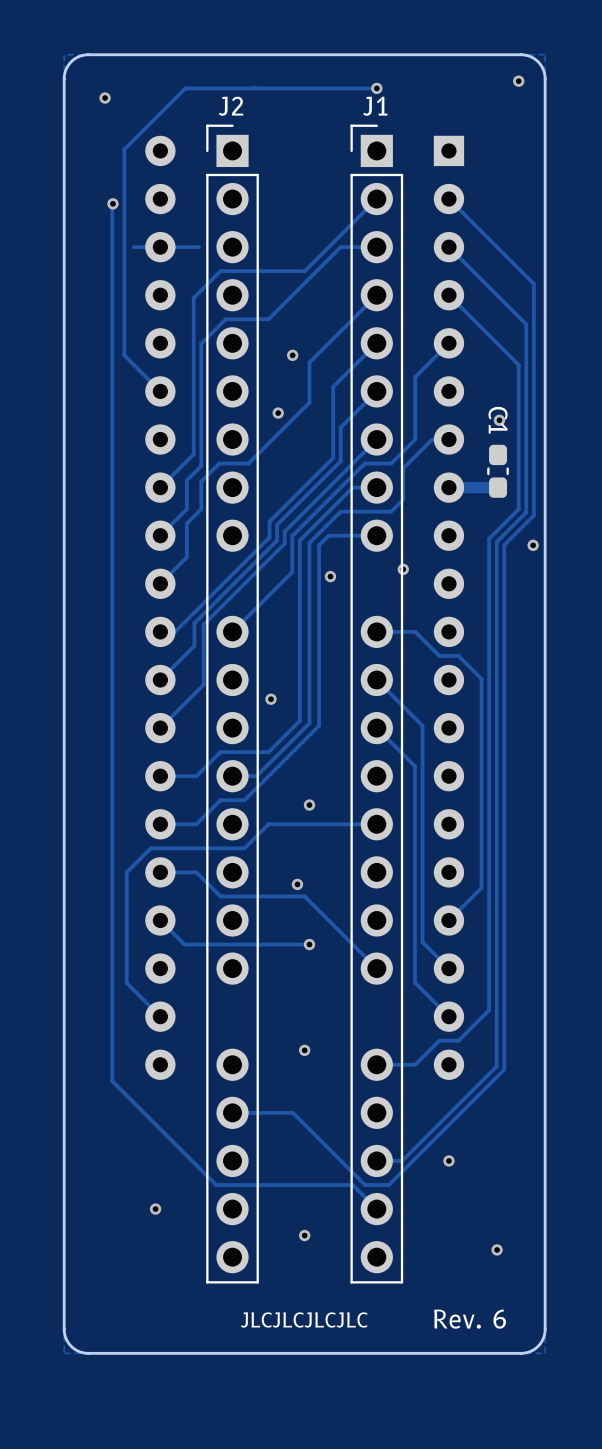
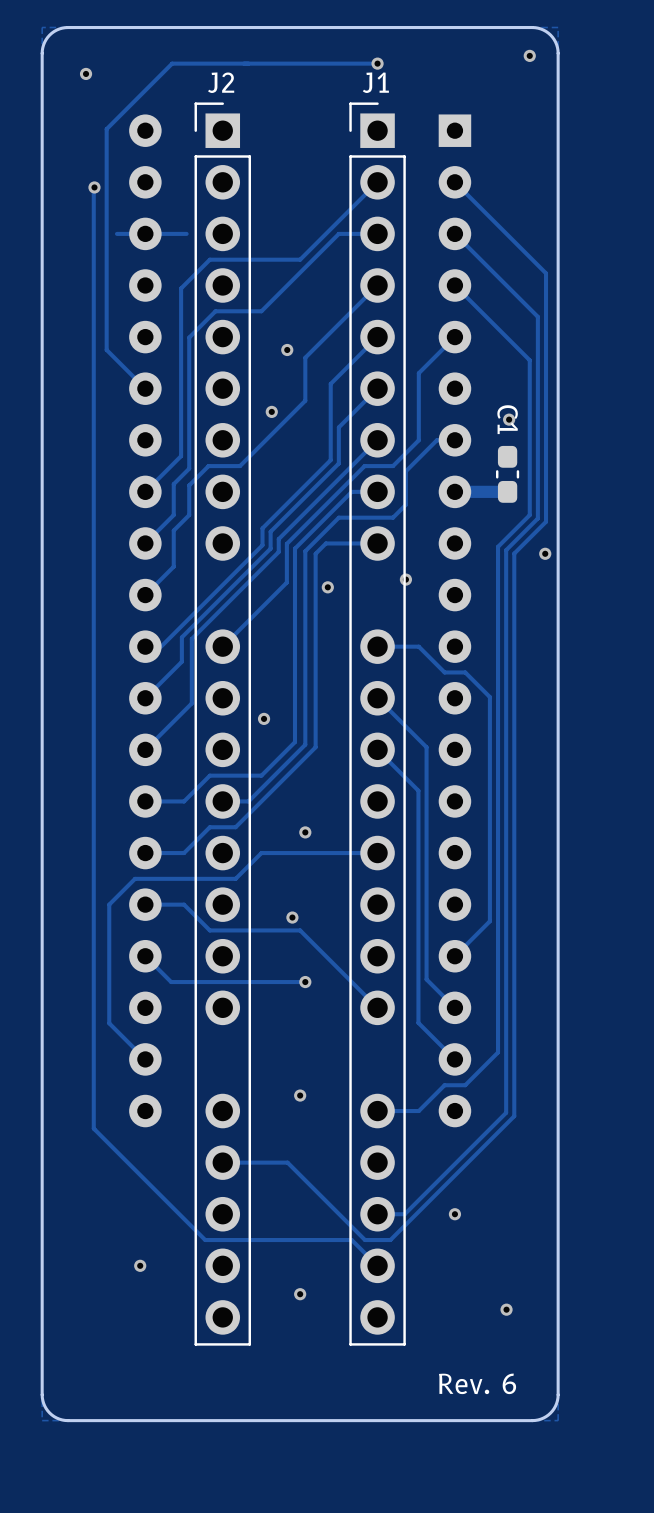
text: JLCJLCJLCJLC (304, 1319) -> none

